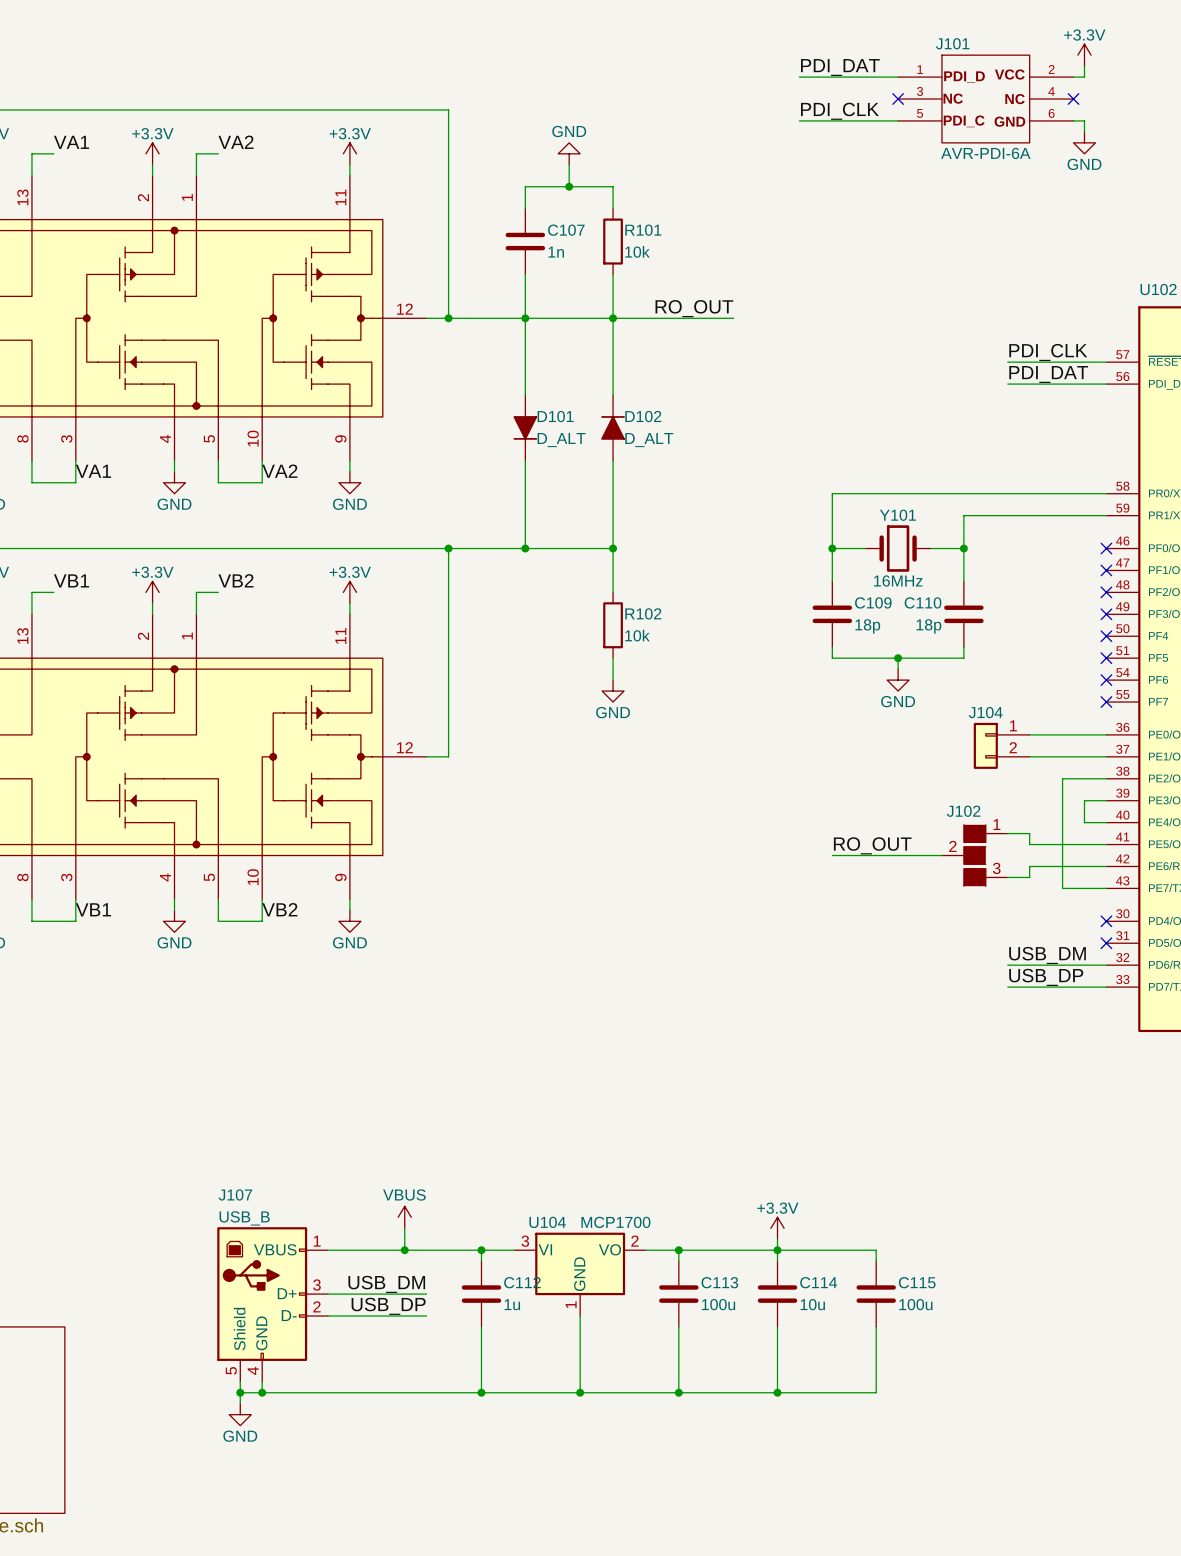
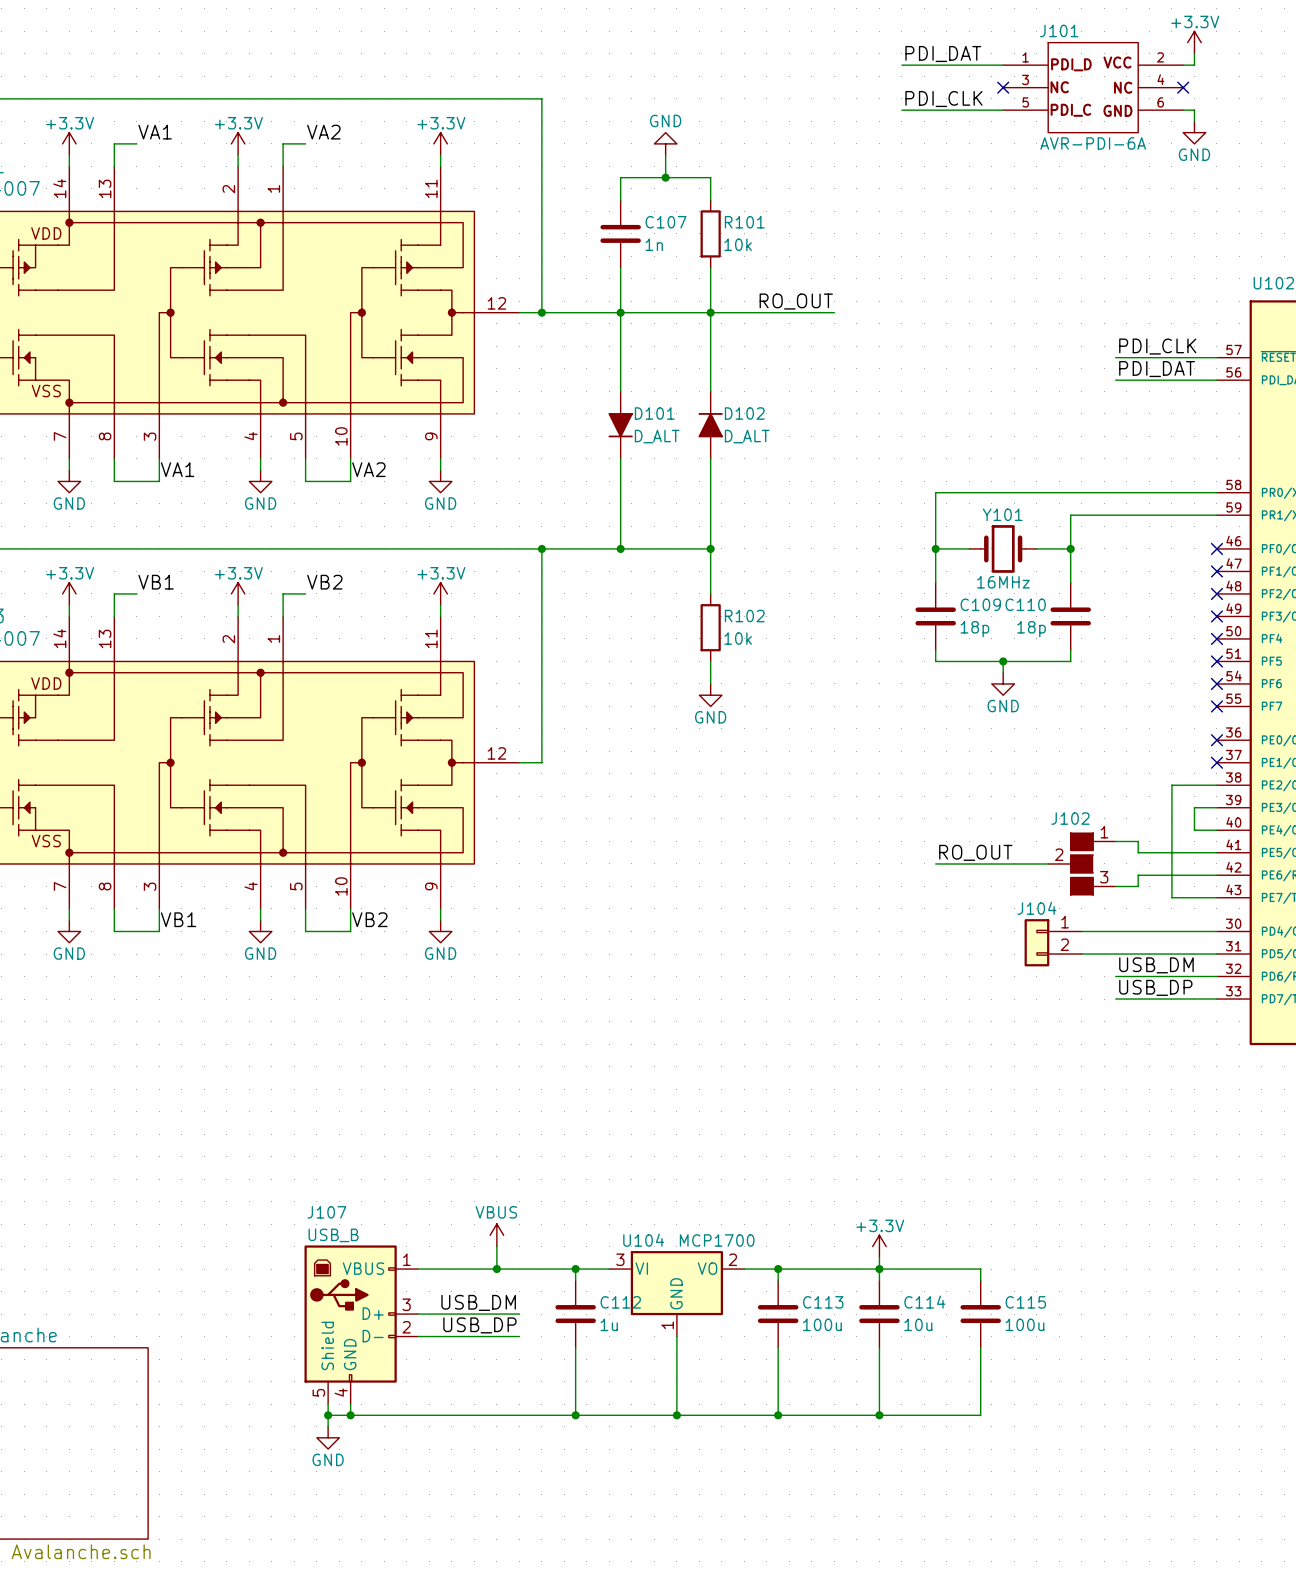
wire: (1029, 734) (1106, 734) -> none
no-connect mark: none -> (1216, 740)
J104 position: (1001, 745) -> (1053, 942)
wire: (1029, 756) (1106, 756) -> none
no-connect mark: none -> (1216, 762)
wire: none -> (1081, 931) (1216, 931)
no-connect mark: (1106, 921) -> none
wire: none -> (1081, 954) (1216, 954)
no-connect mark: (1106, 943) -> none

